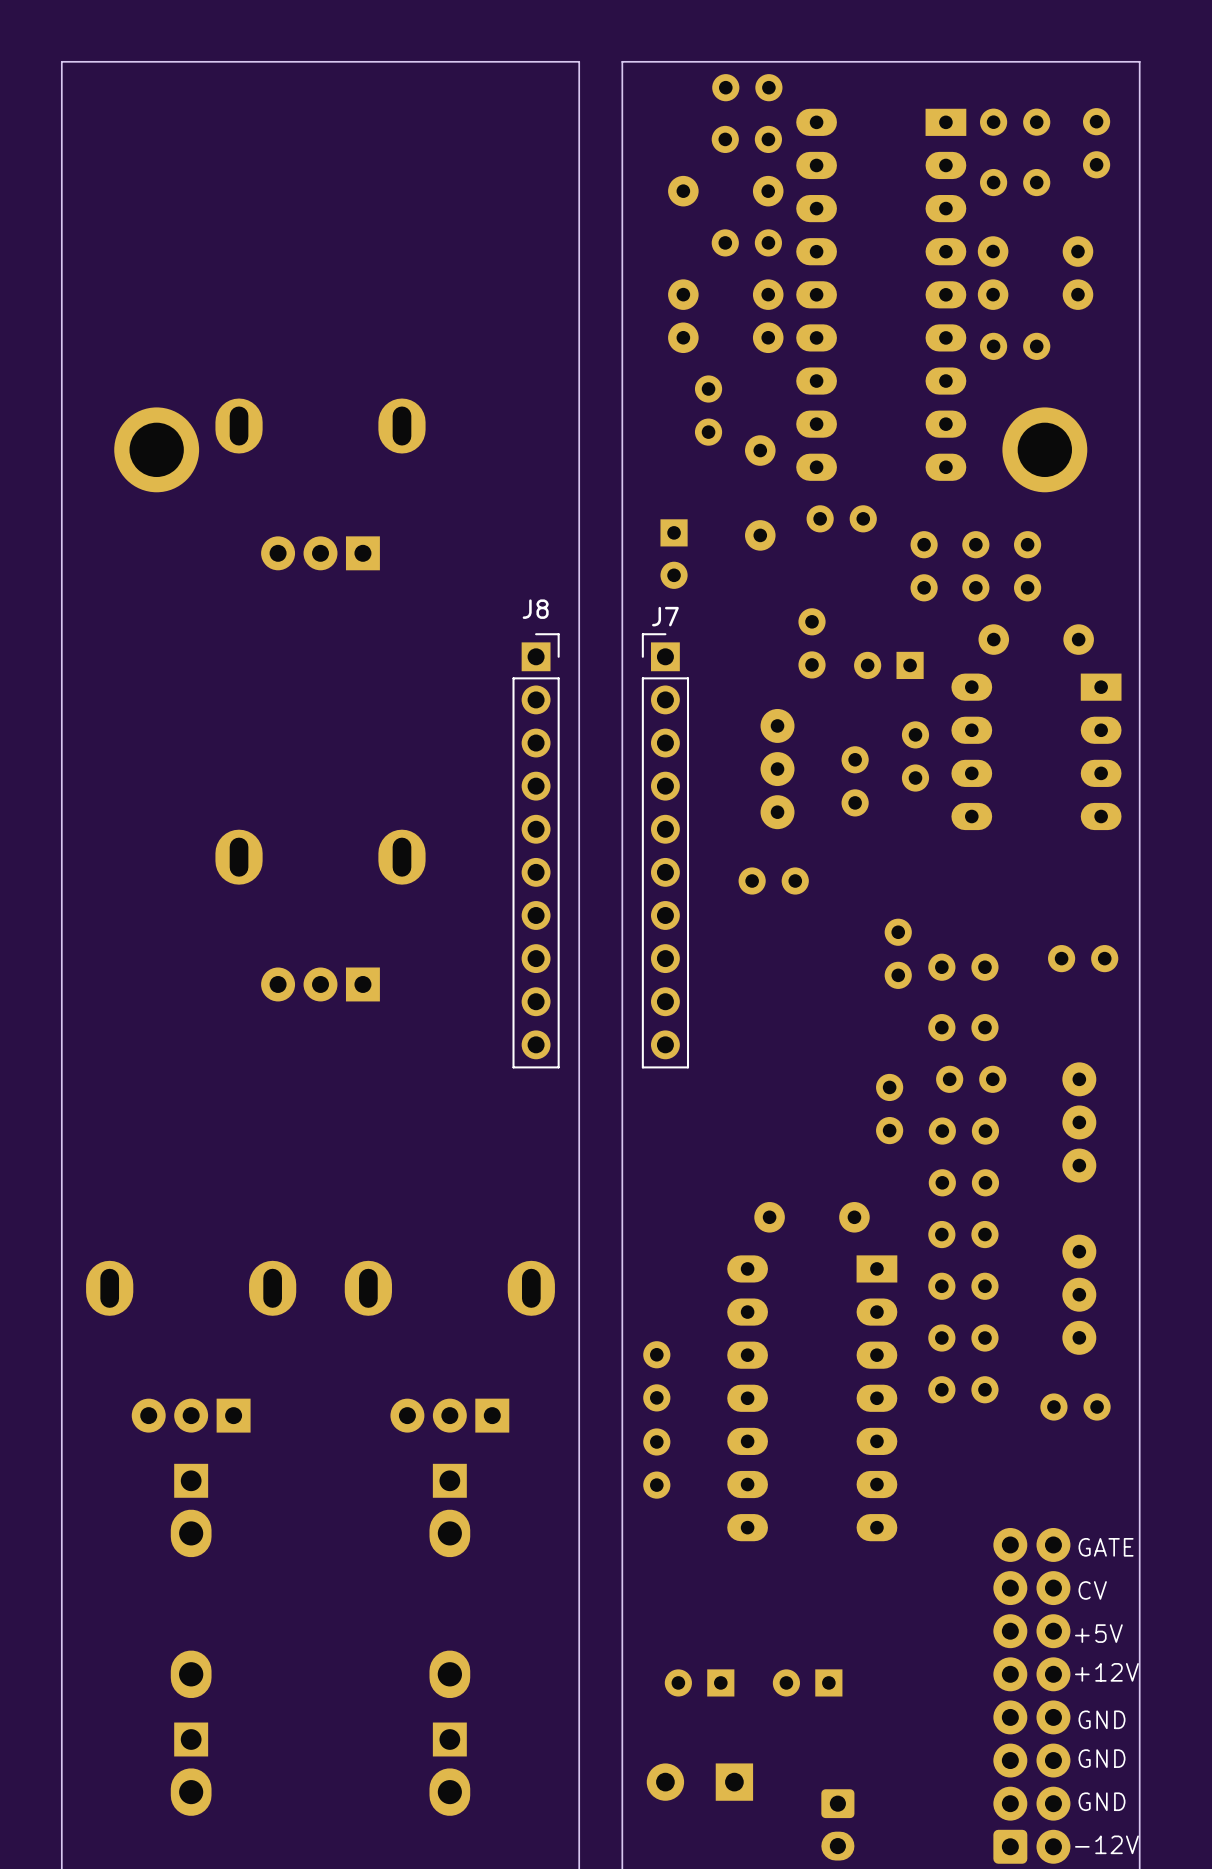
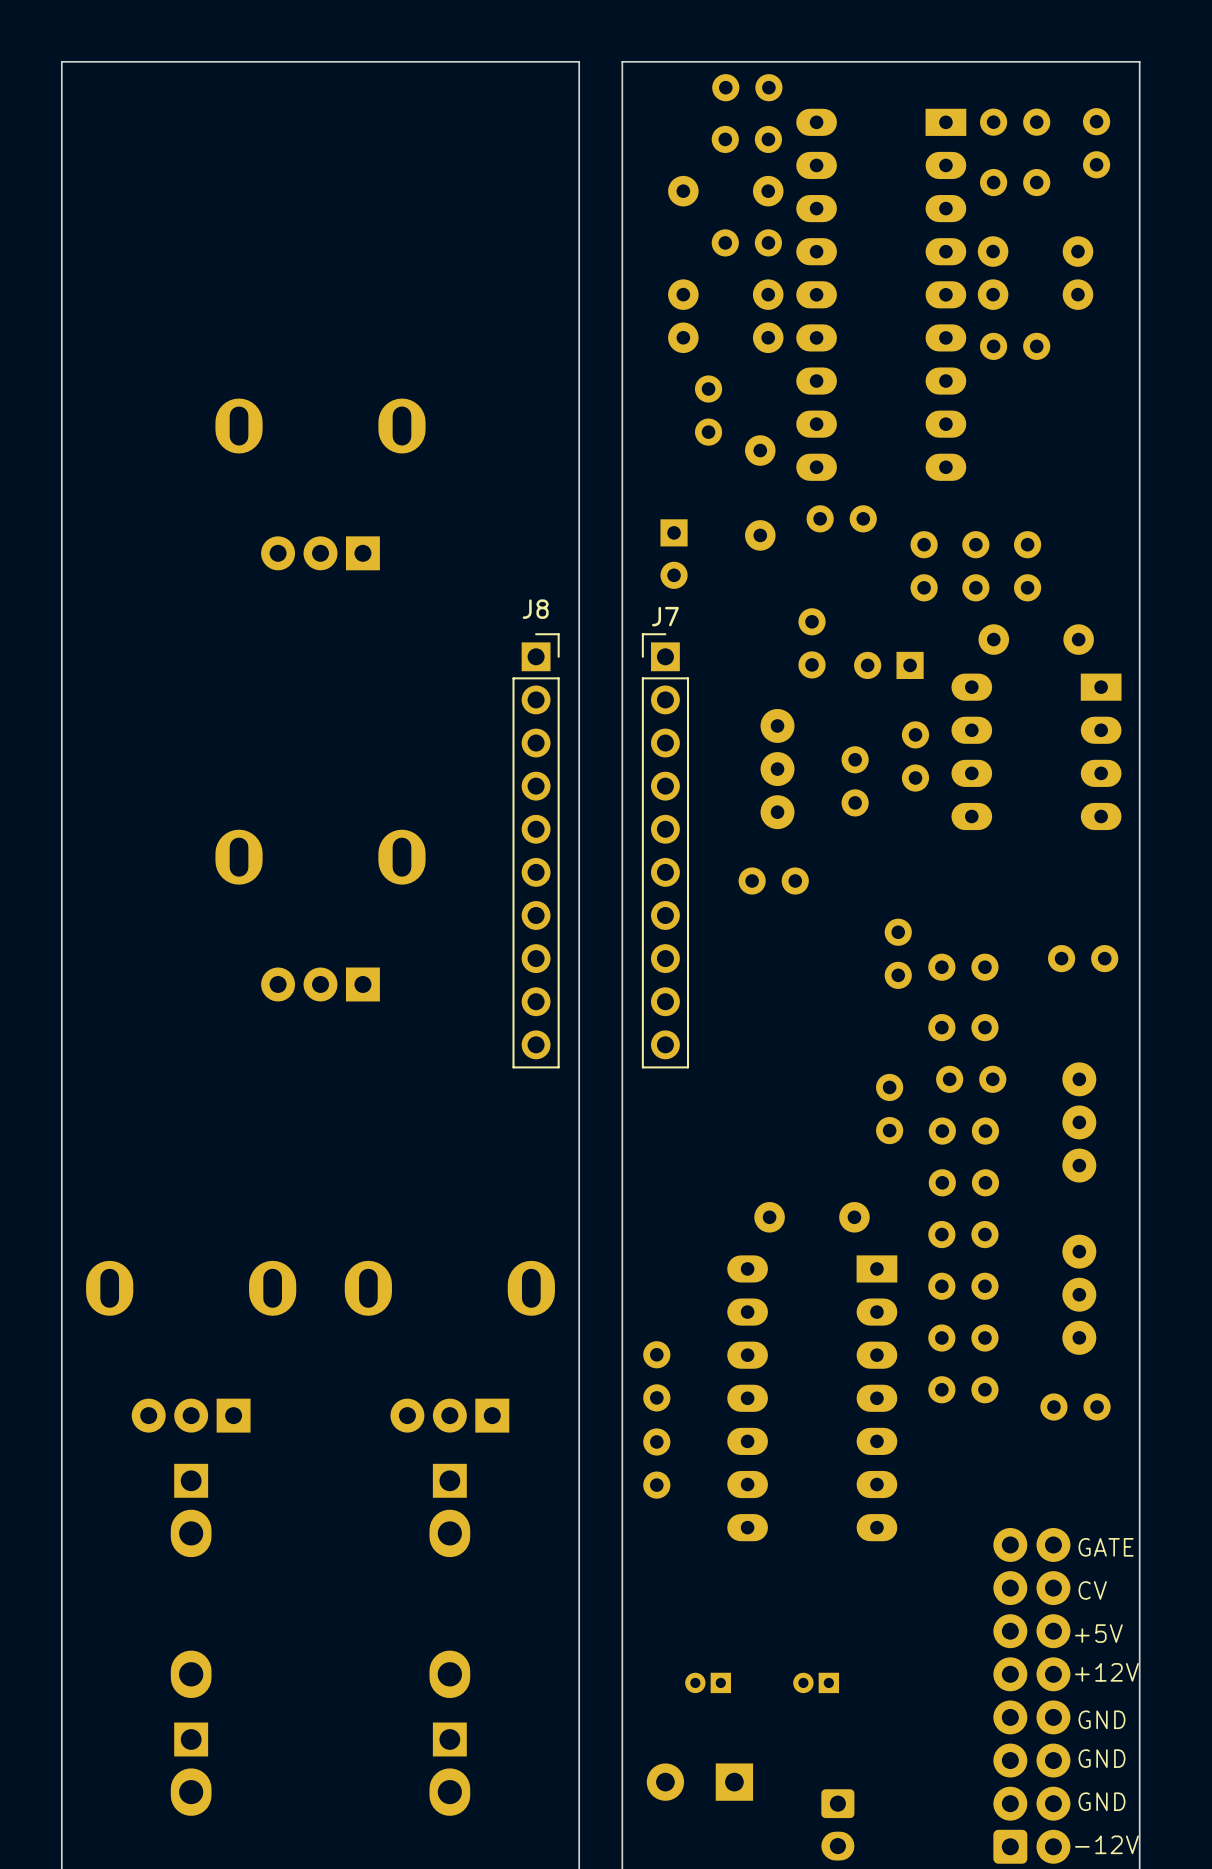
part: (156, 449) -> none
part: (1044, 449) -> none
part footprint: [664, 1669, 735, 1697] -> [685, 1672, 731, 1694]
part footprint: [772, 1669, 843, 1697] -> [793, 1672, 840, 1694]

